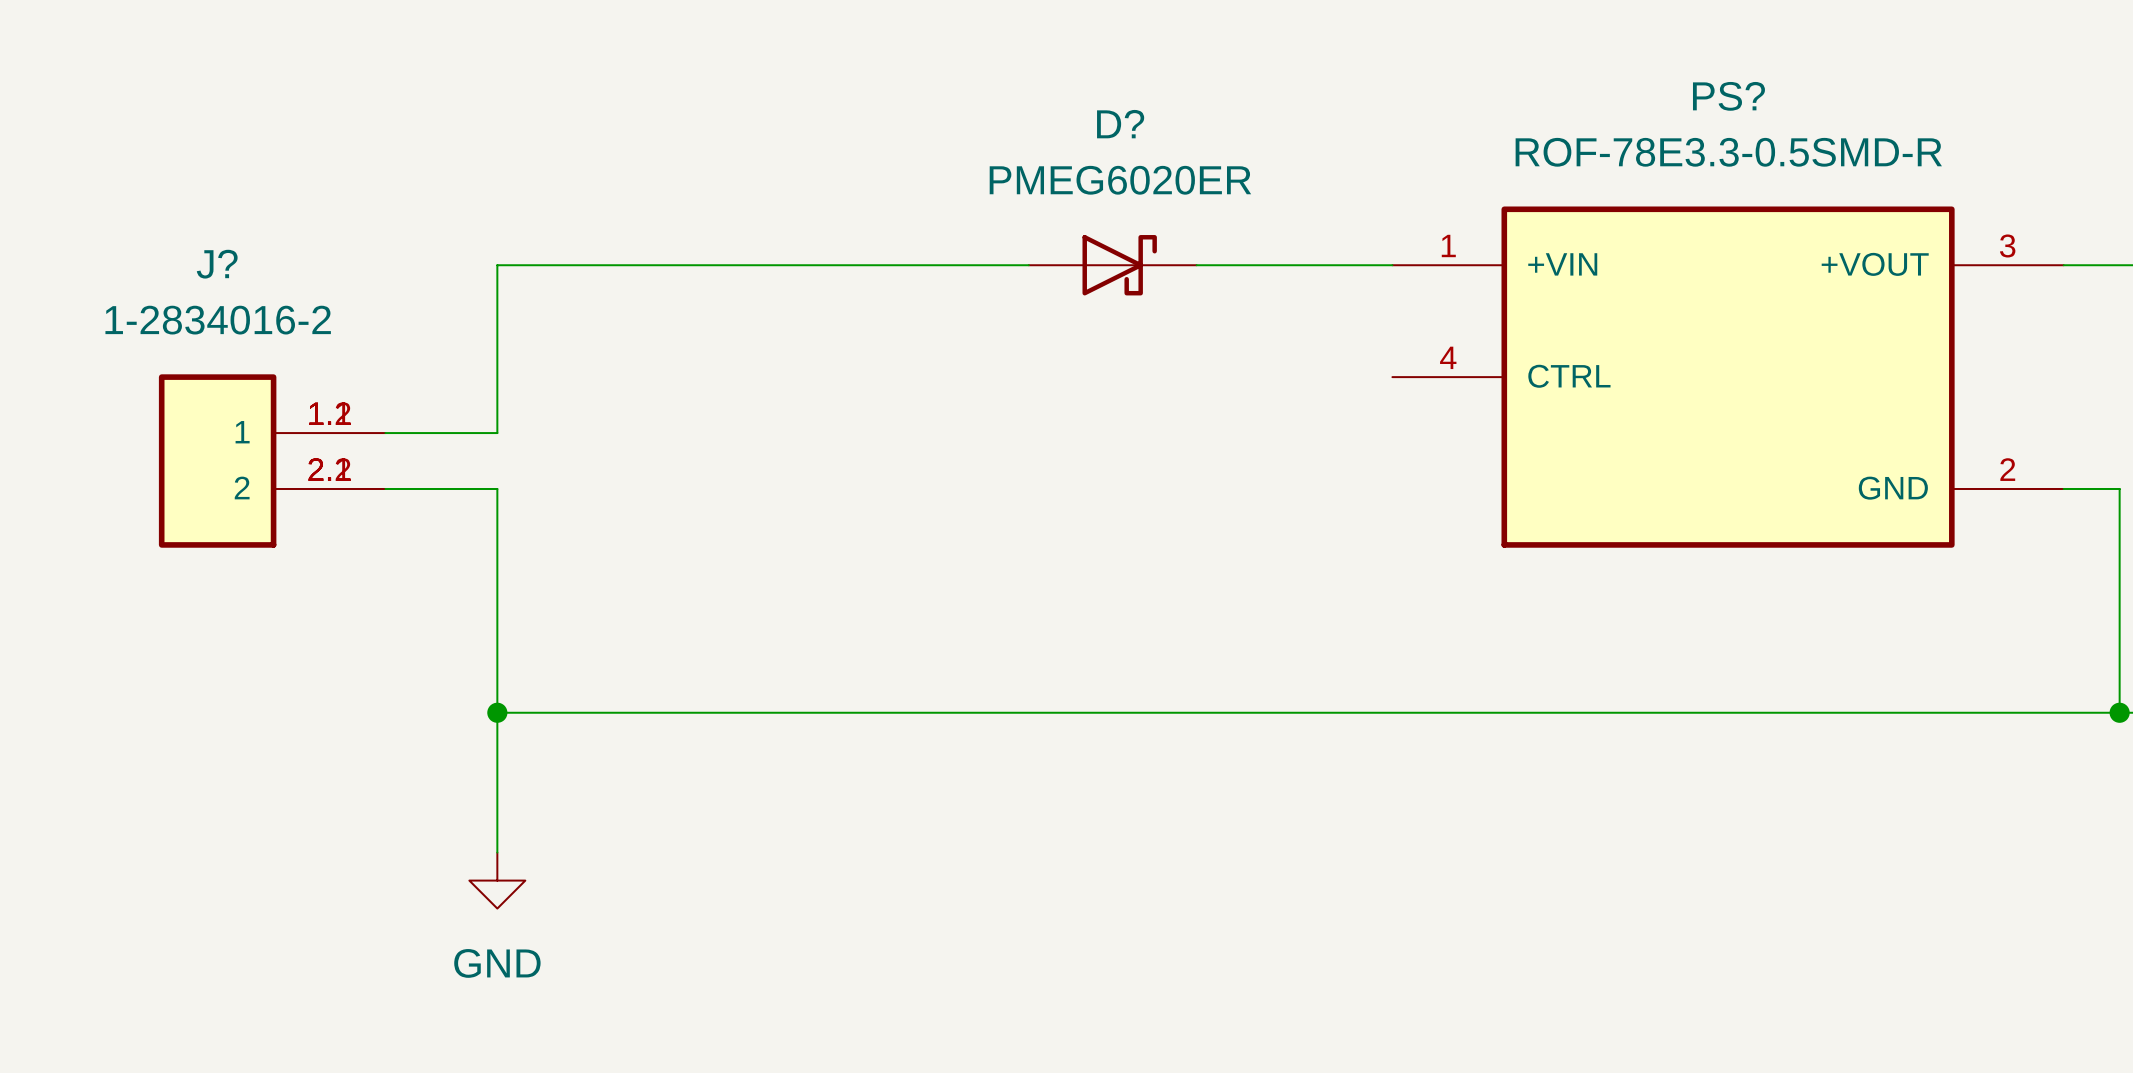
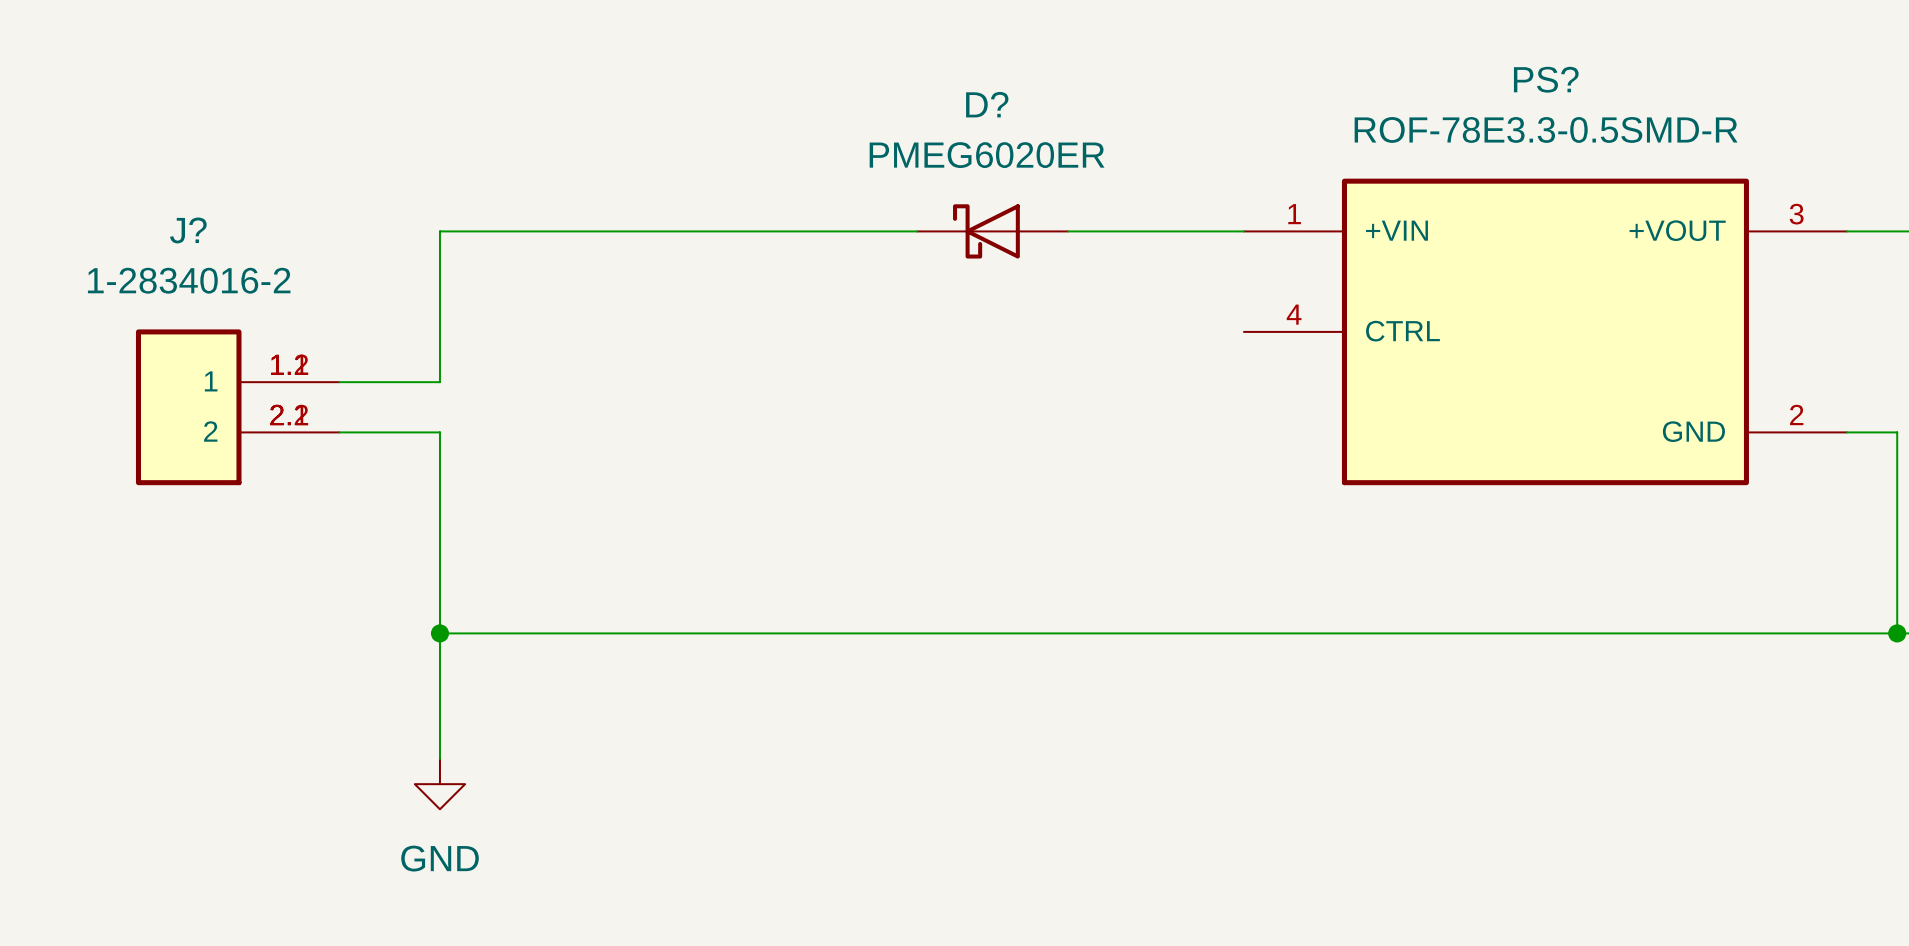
D? flip: as is (1119, 265) -> left-right (986, 231)

